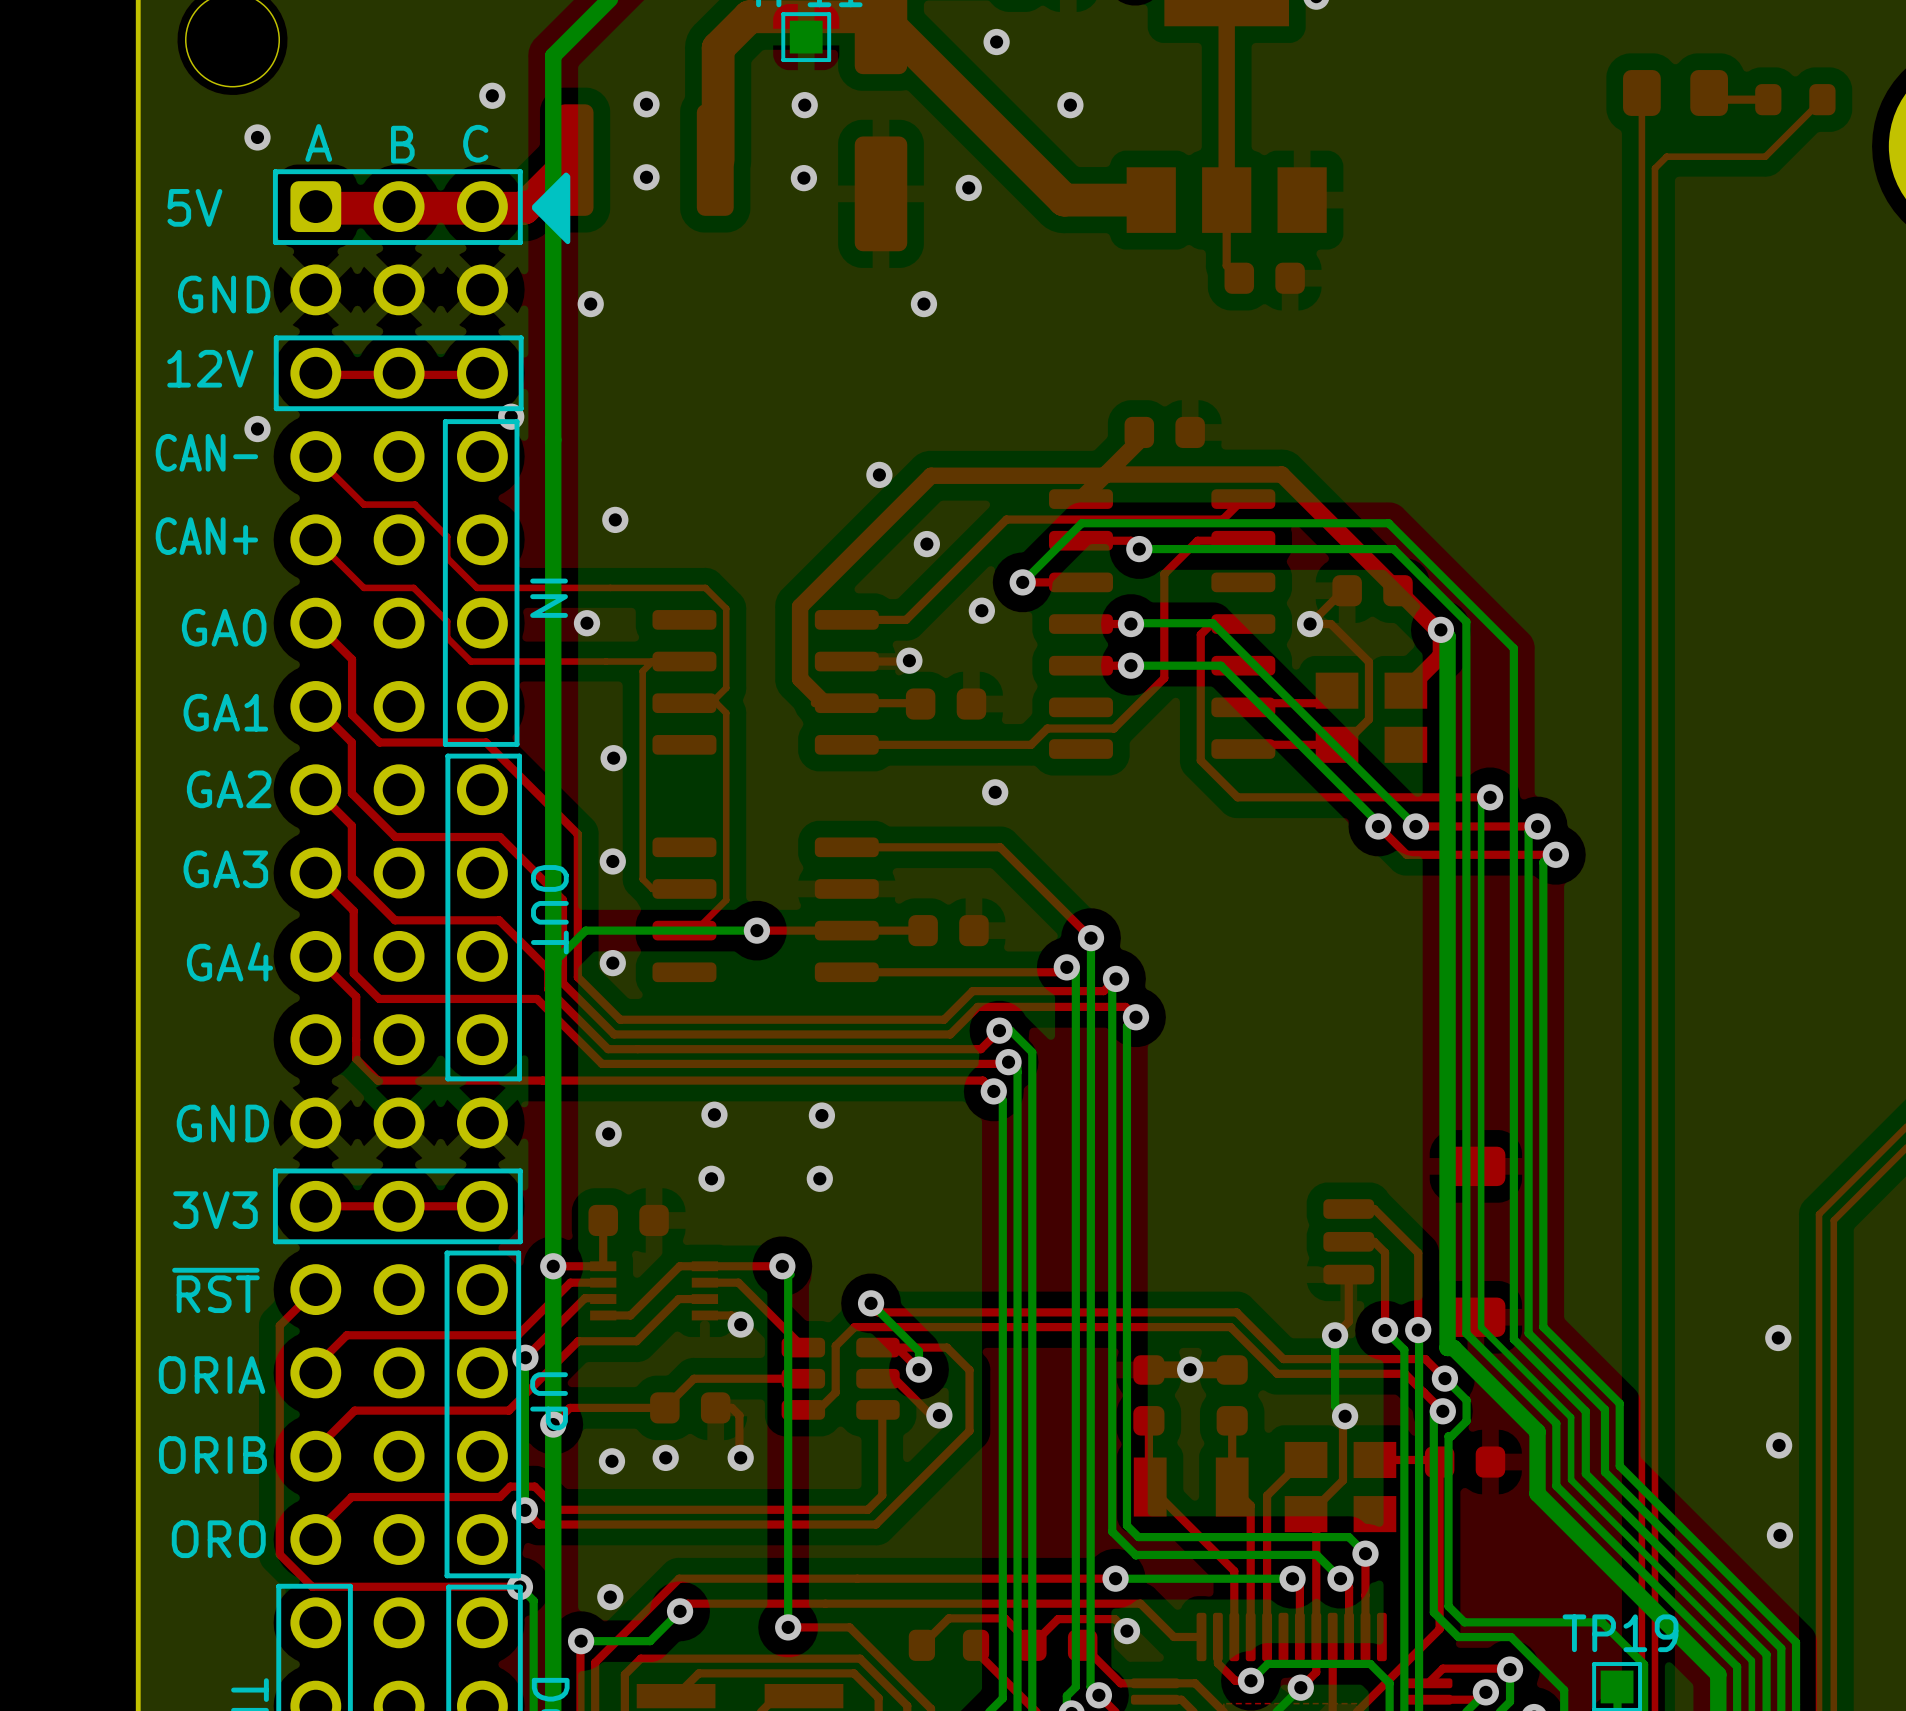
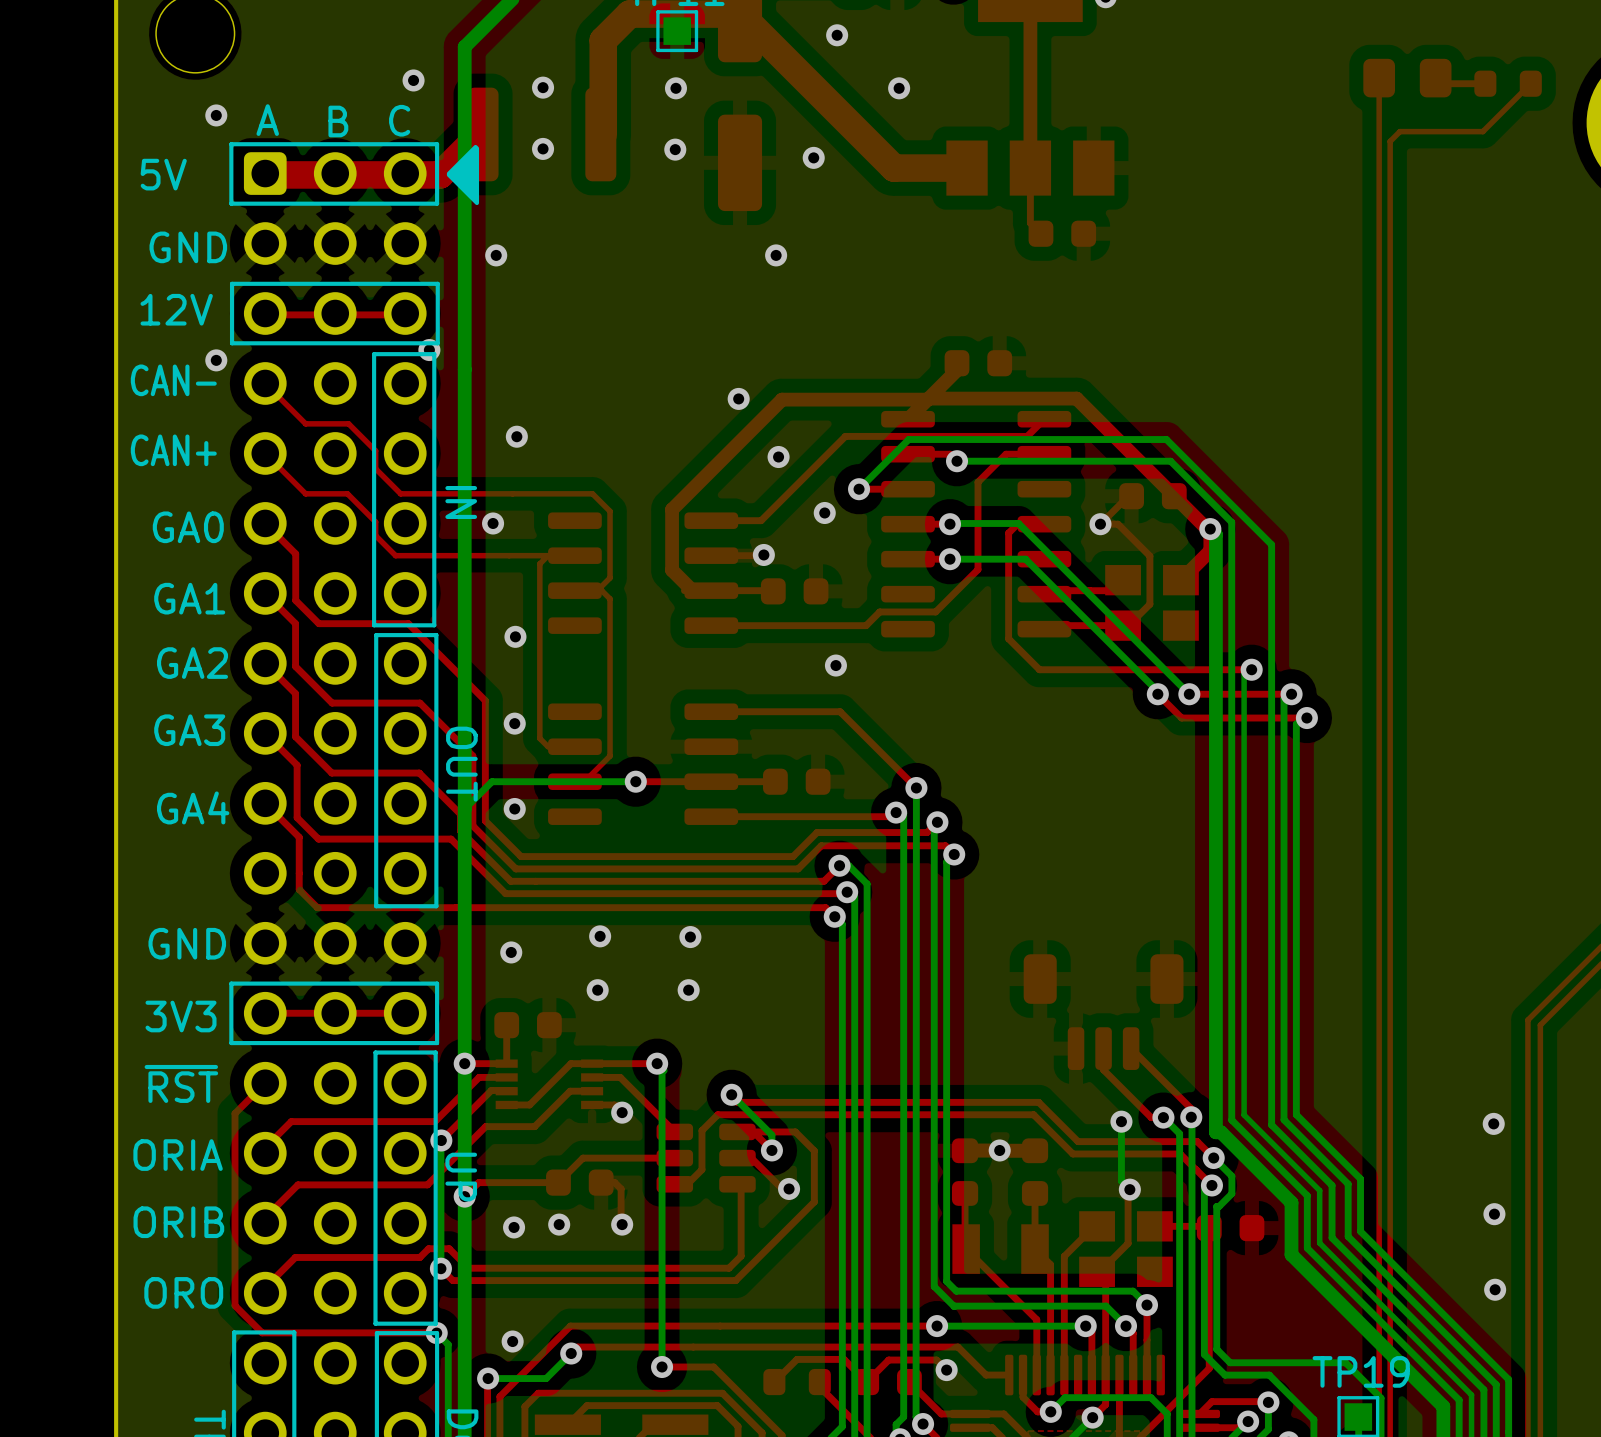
part: none -> (1103, 1012)
top track: (1348, 1209) (1374, 1209) (1418, 1253) (1418, 1319) -> (1131, 1048) (1191, 1108)
top track: (1348, 1241) (1374, 1241) (1385, 1252) (1385, 1330) -> (1103, 1048) (1103, 1069) (1151, 1117) (1163, 1117)
part: (1414, 1241) -> none
top track: (1348, 1274) (1348, 1321) (1335, 1335) -> none

